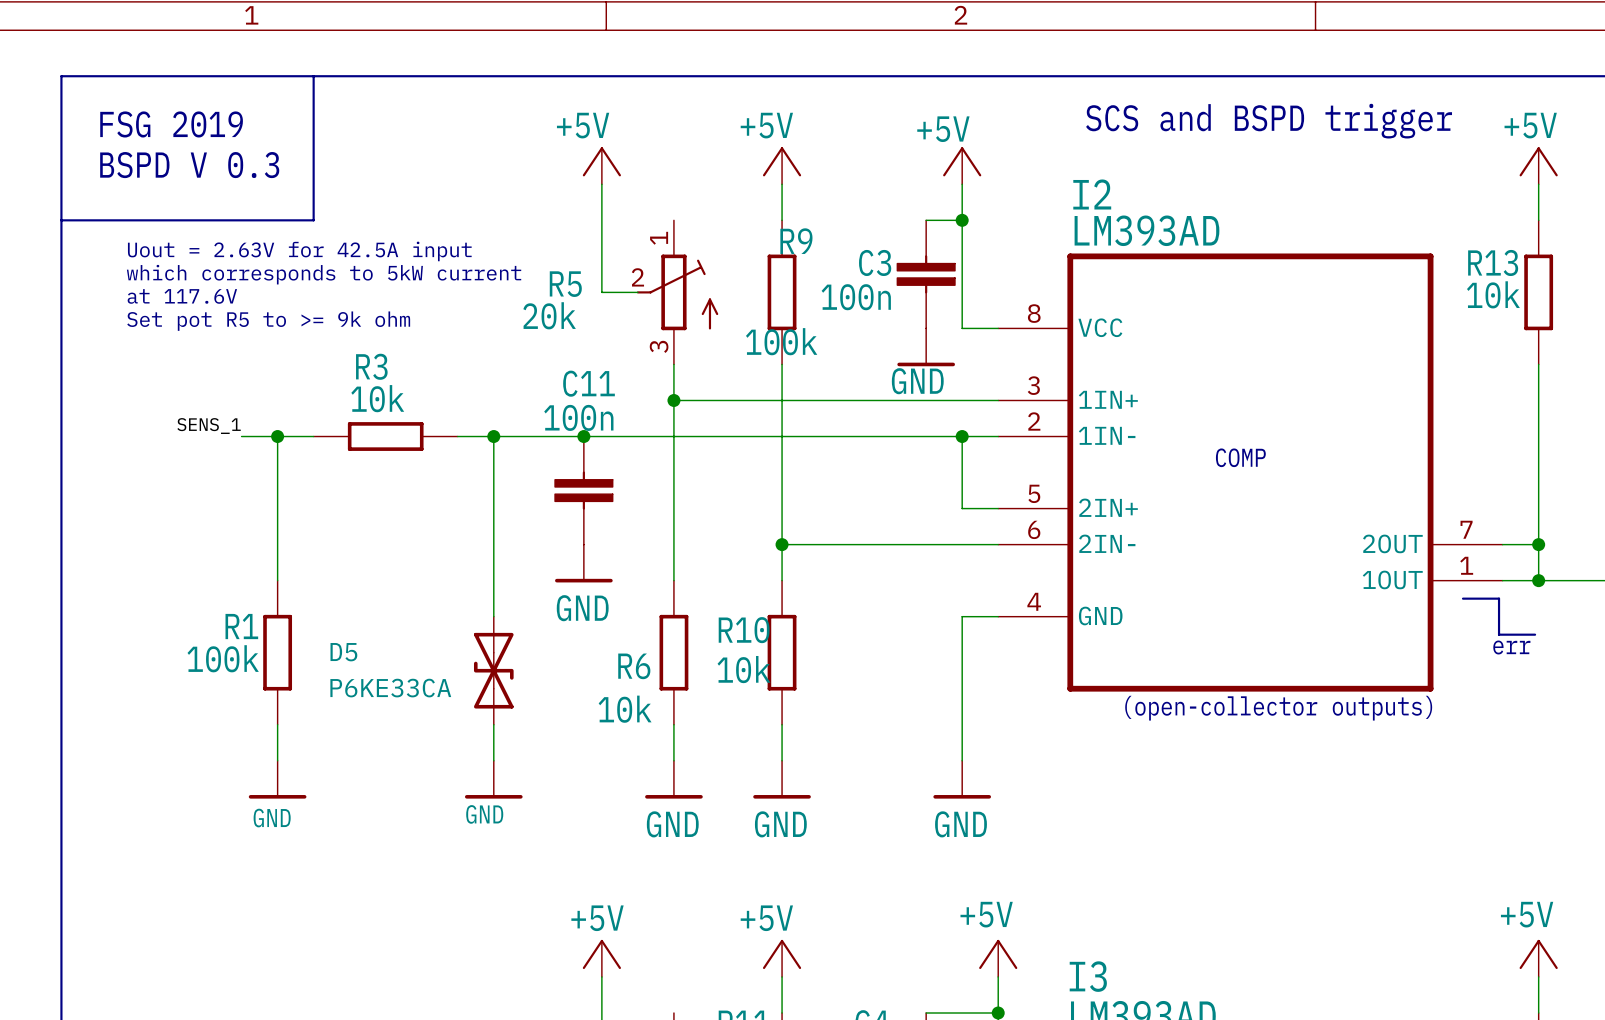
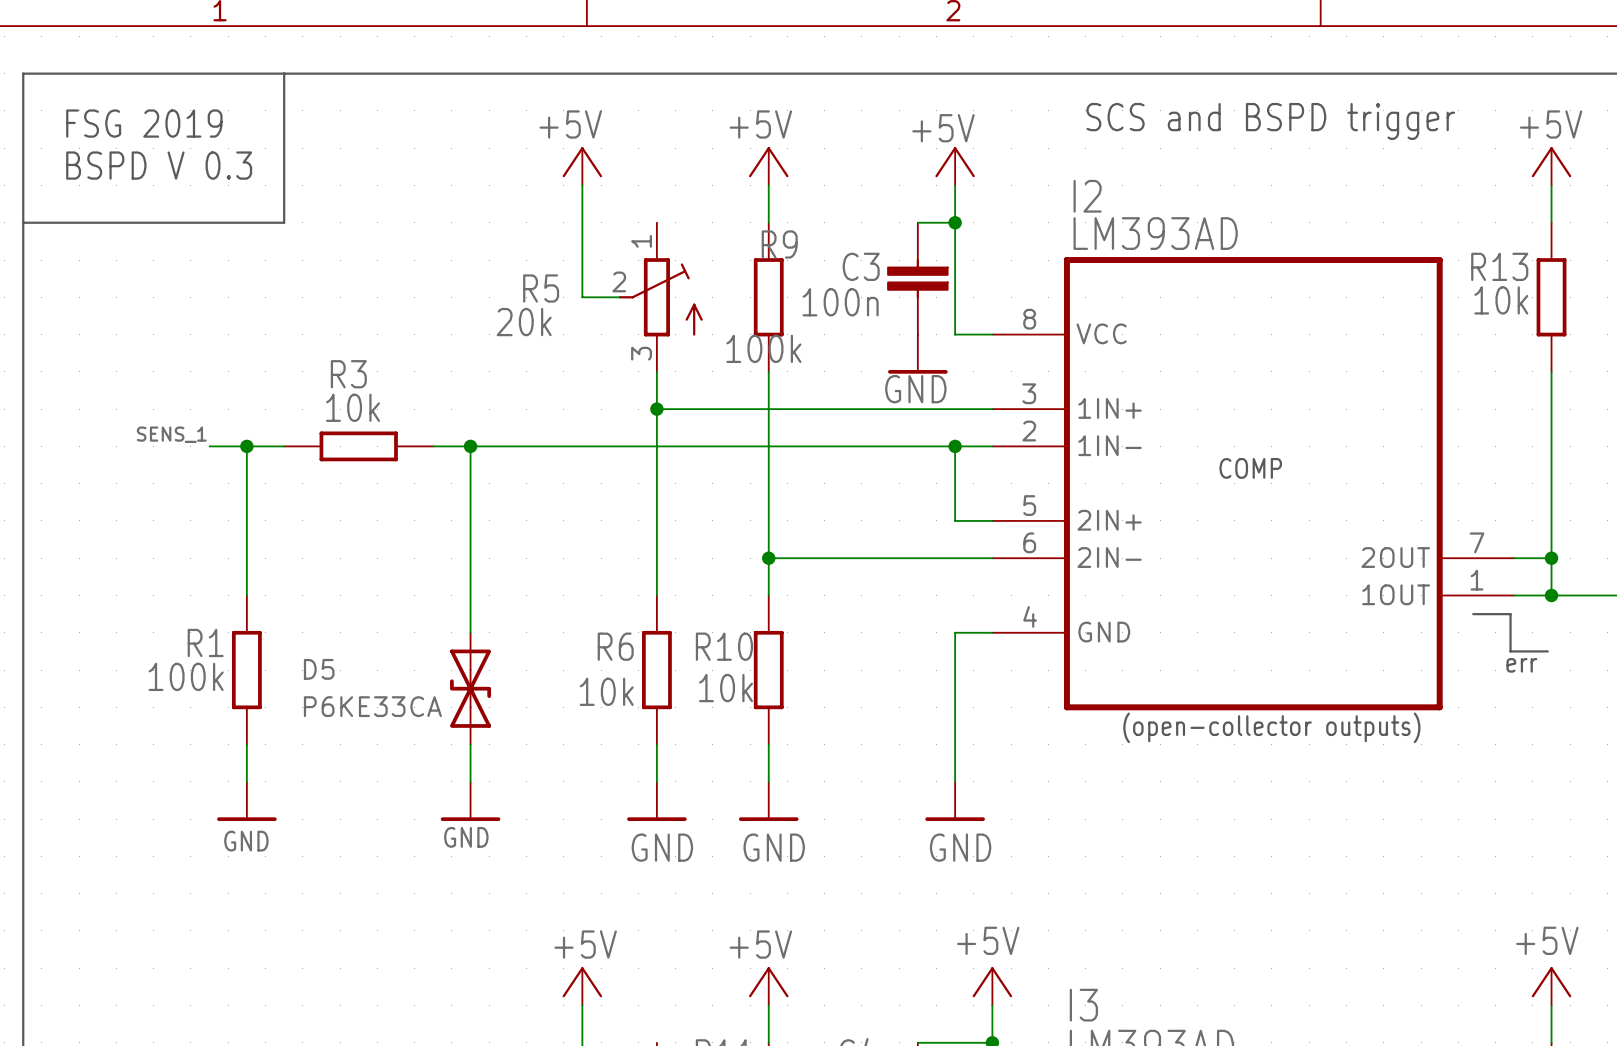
text: Uout = 2.63V for 42.5A input (299, 251) -> none
text: which corresponds to 5kW current (324, 274) -> none
text: at 117.6V (182, 296) -> none
text: Set pot R5 to >= 9k ohm (268, 321) -> none
junction: (583, 436) -> none
C11: 100n (583, 490) -> none
power symbol: GND (583, 563) -> none
R6 name position: R6 (634, 666) -> R6 (615, 646)
R6 value position: 10k (625, 709) -> 10k (606, 691)

